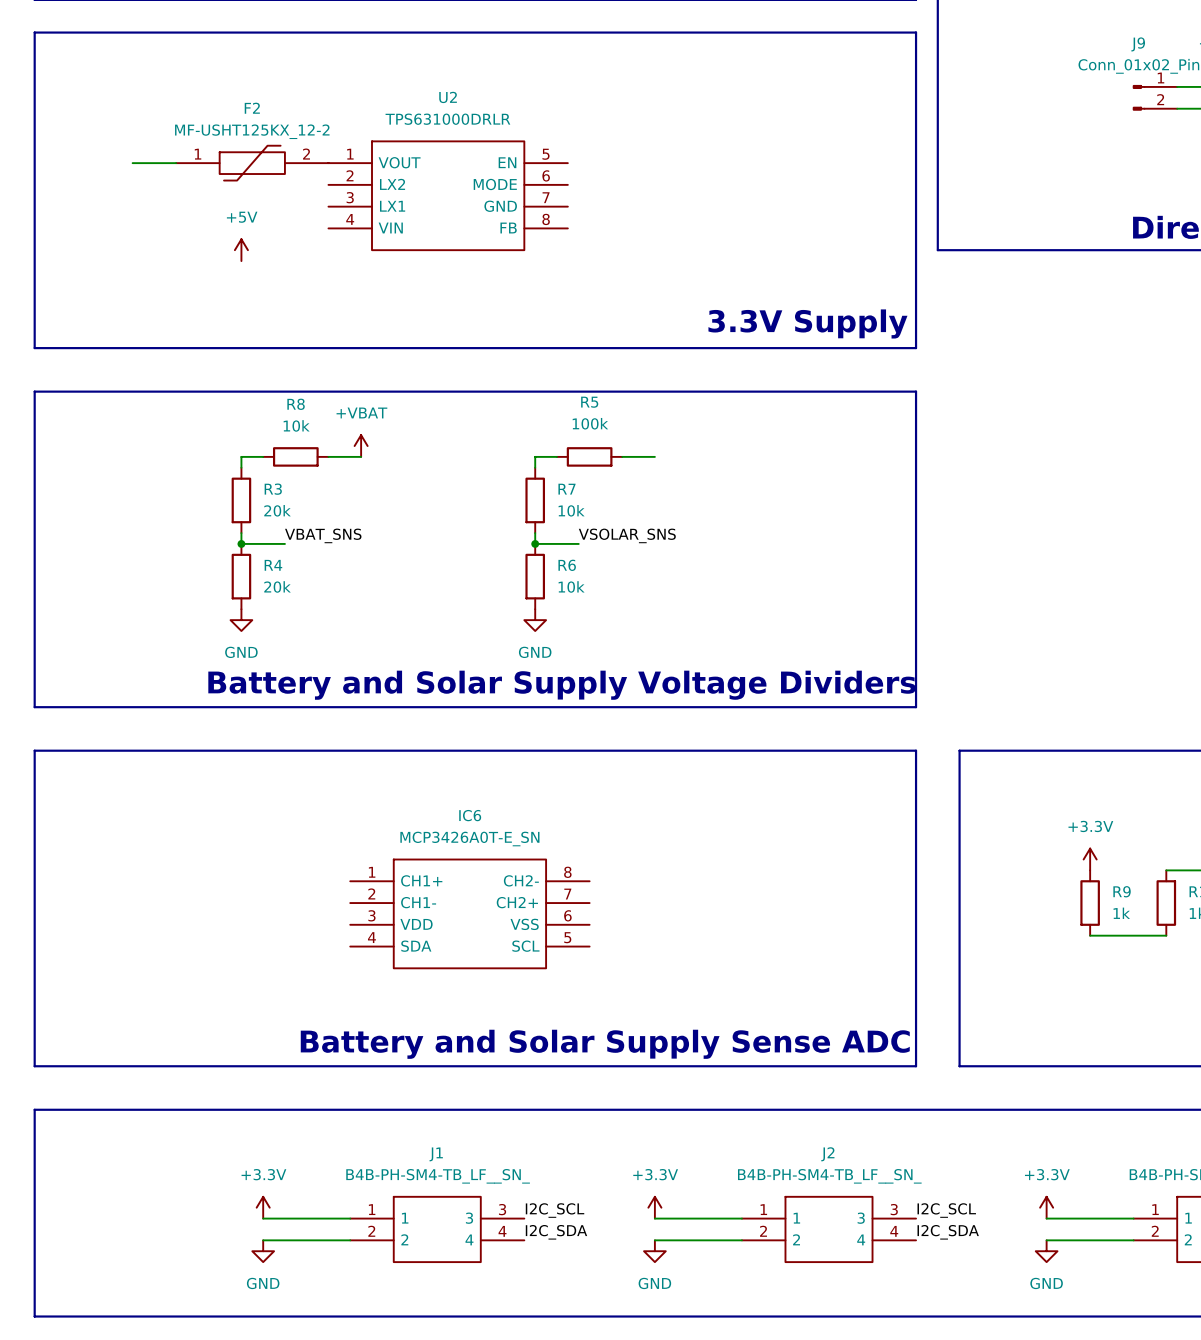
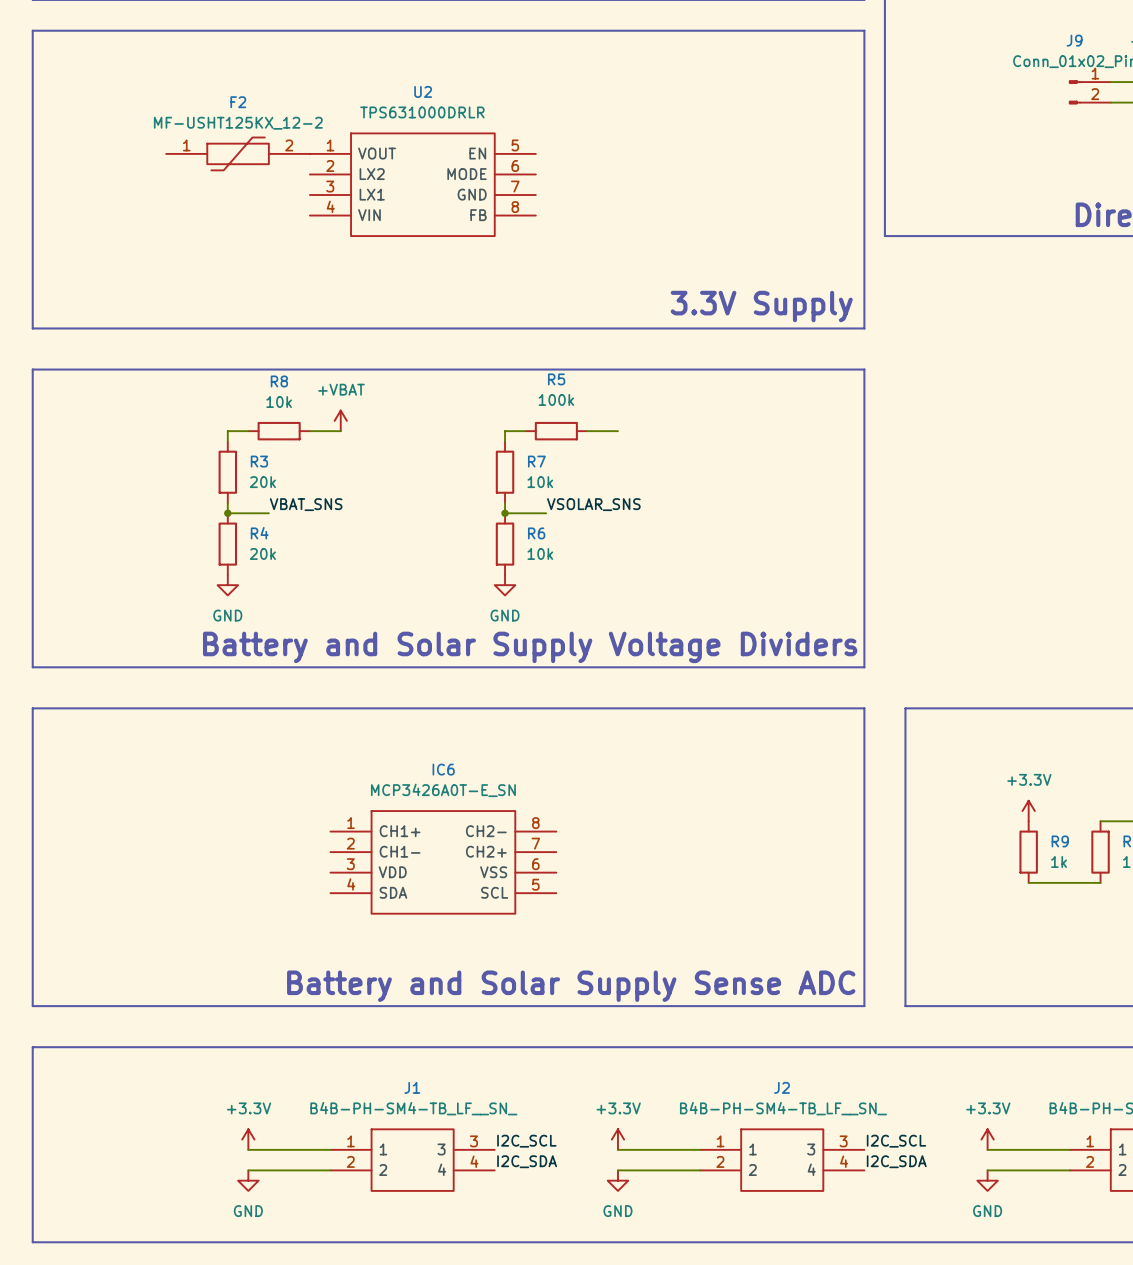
wire: (132, 163) (176, 163) -> none
power symbol: +5V (241, 250) -> none

